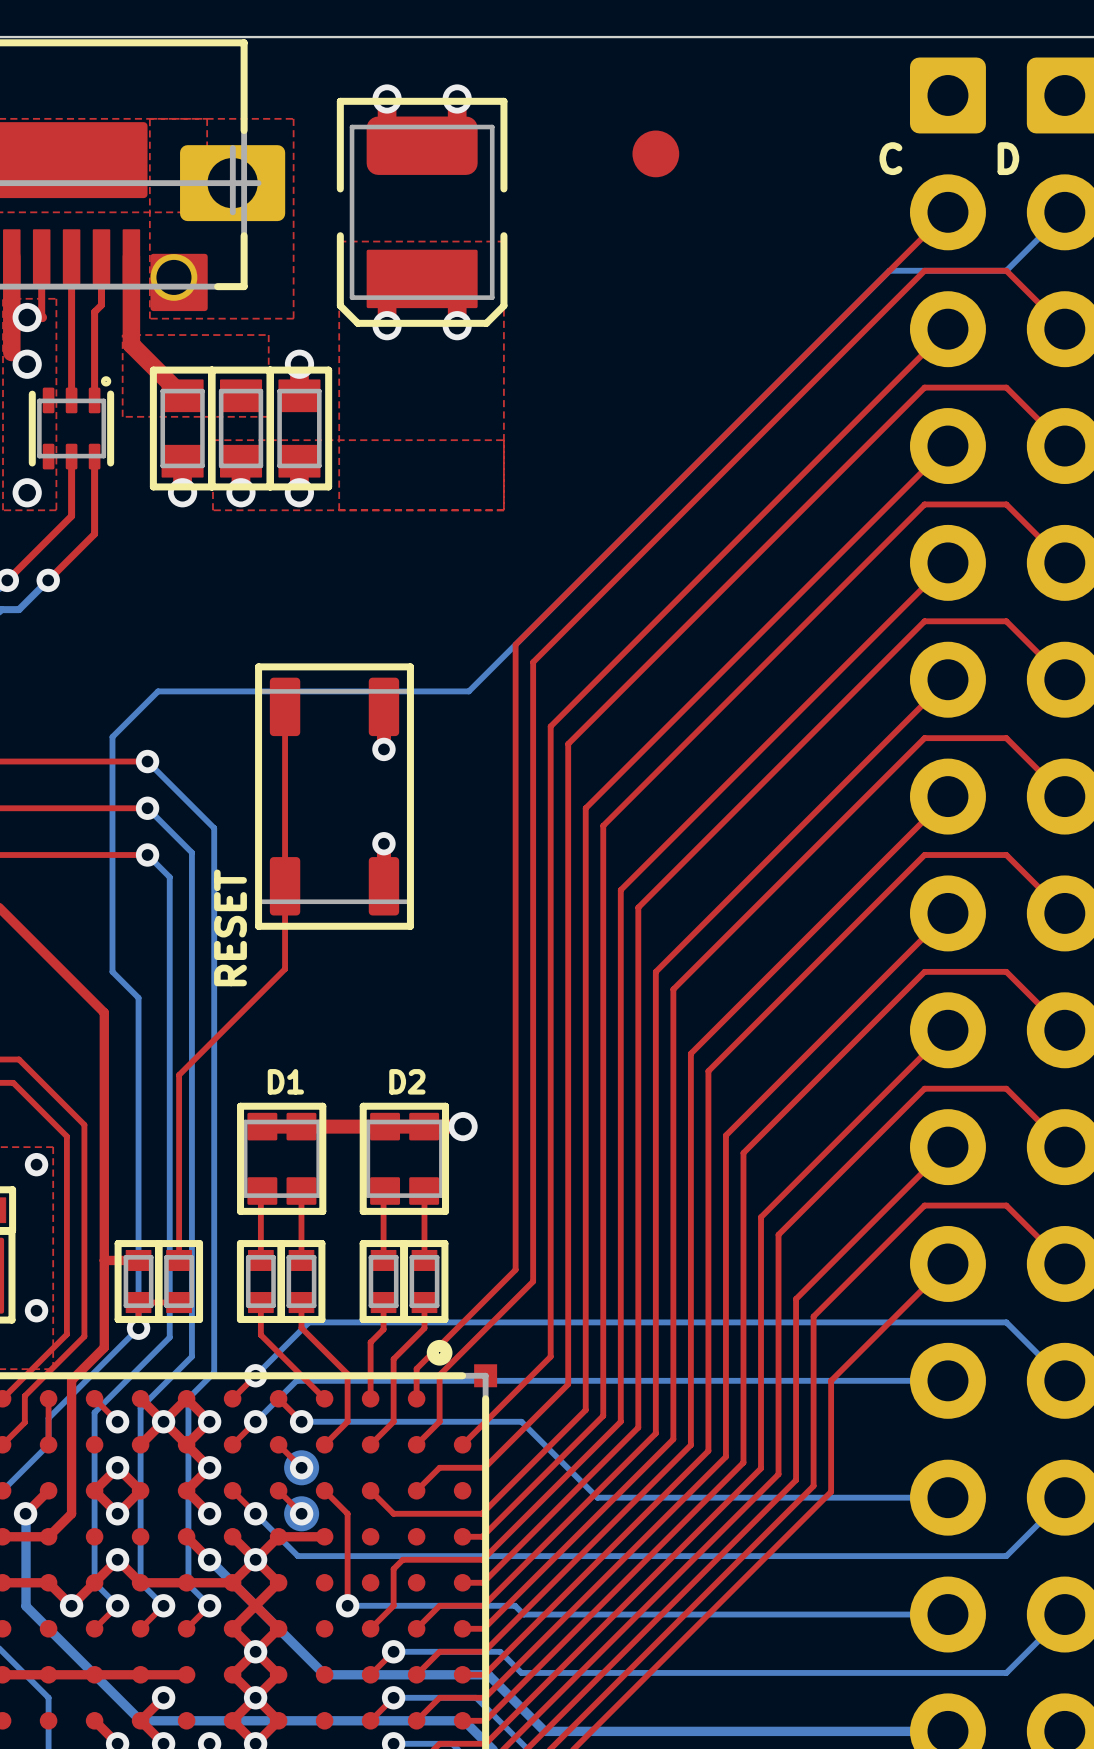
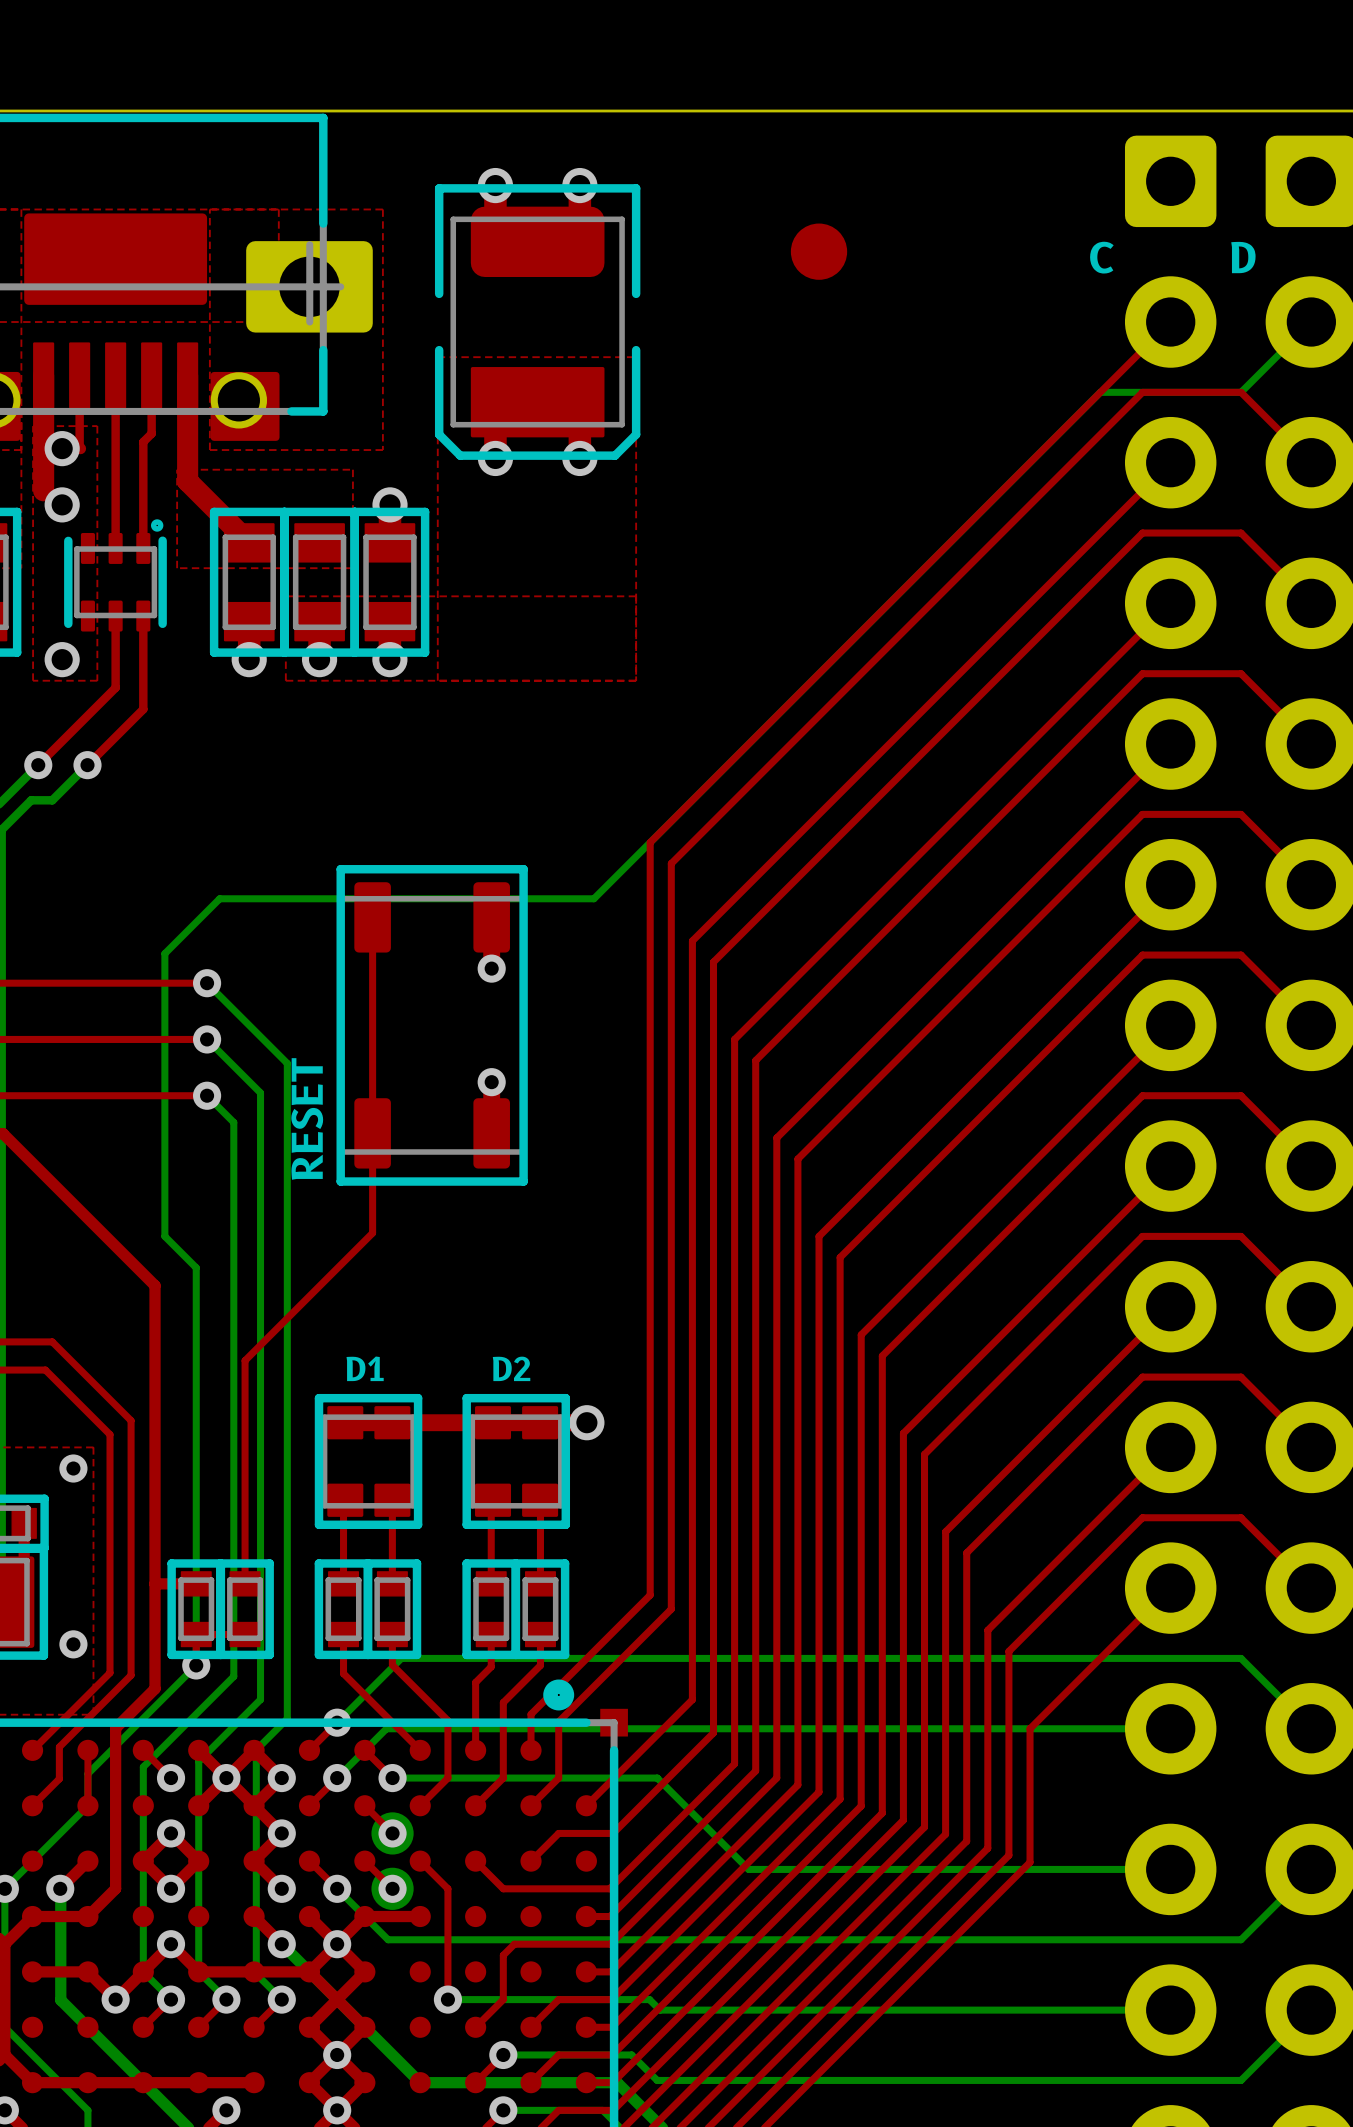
text position: RESET (230, 927) -> RESET (307, 1118)

